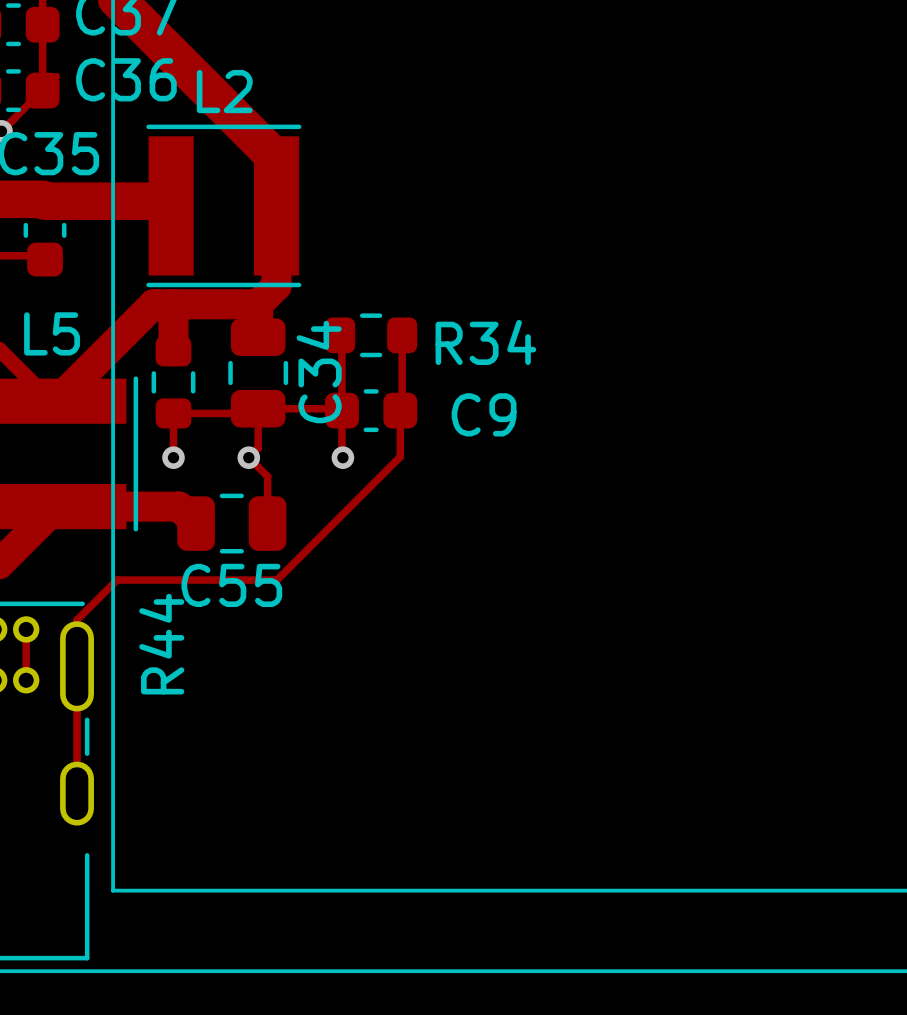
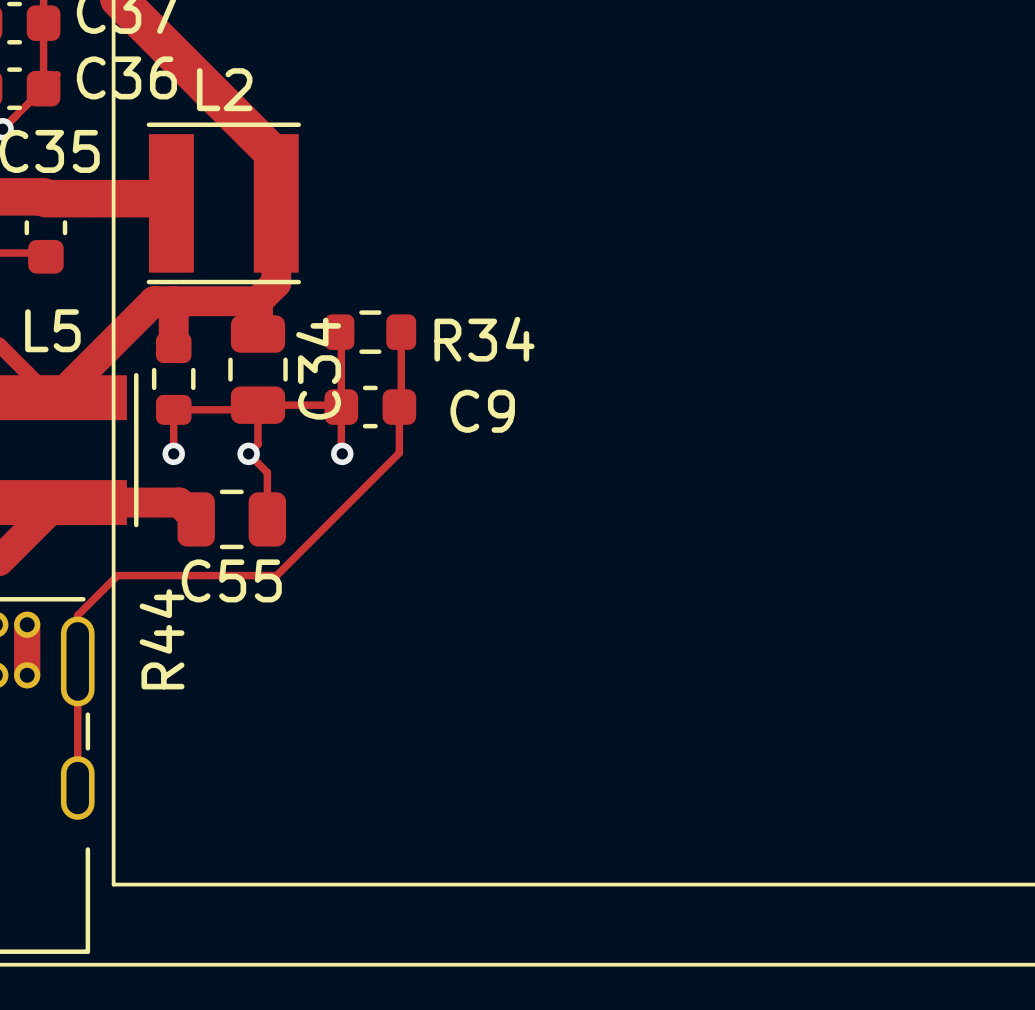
track width: thin (26, 629) (26, 680) -> thick (27, 624) (27, 675)

